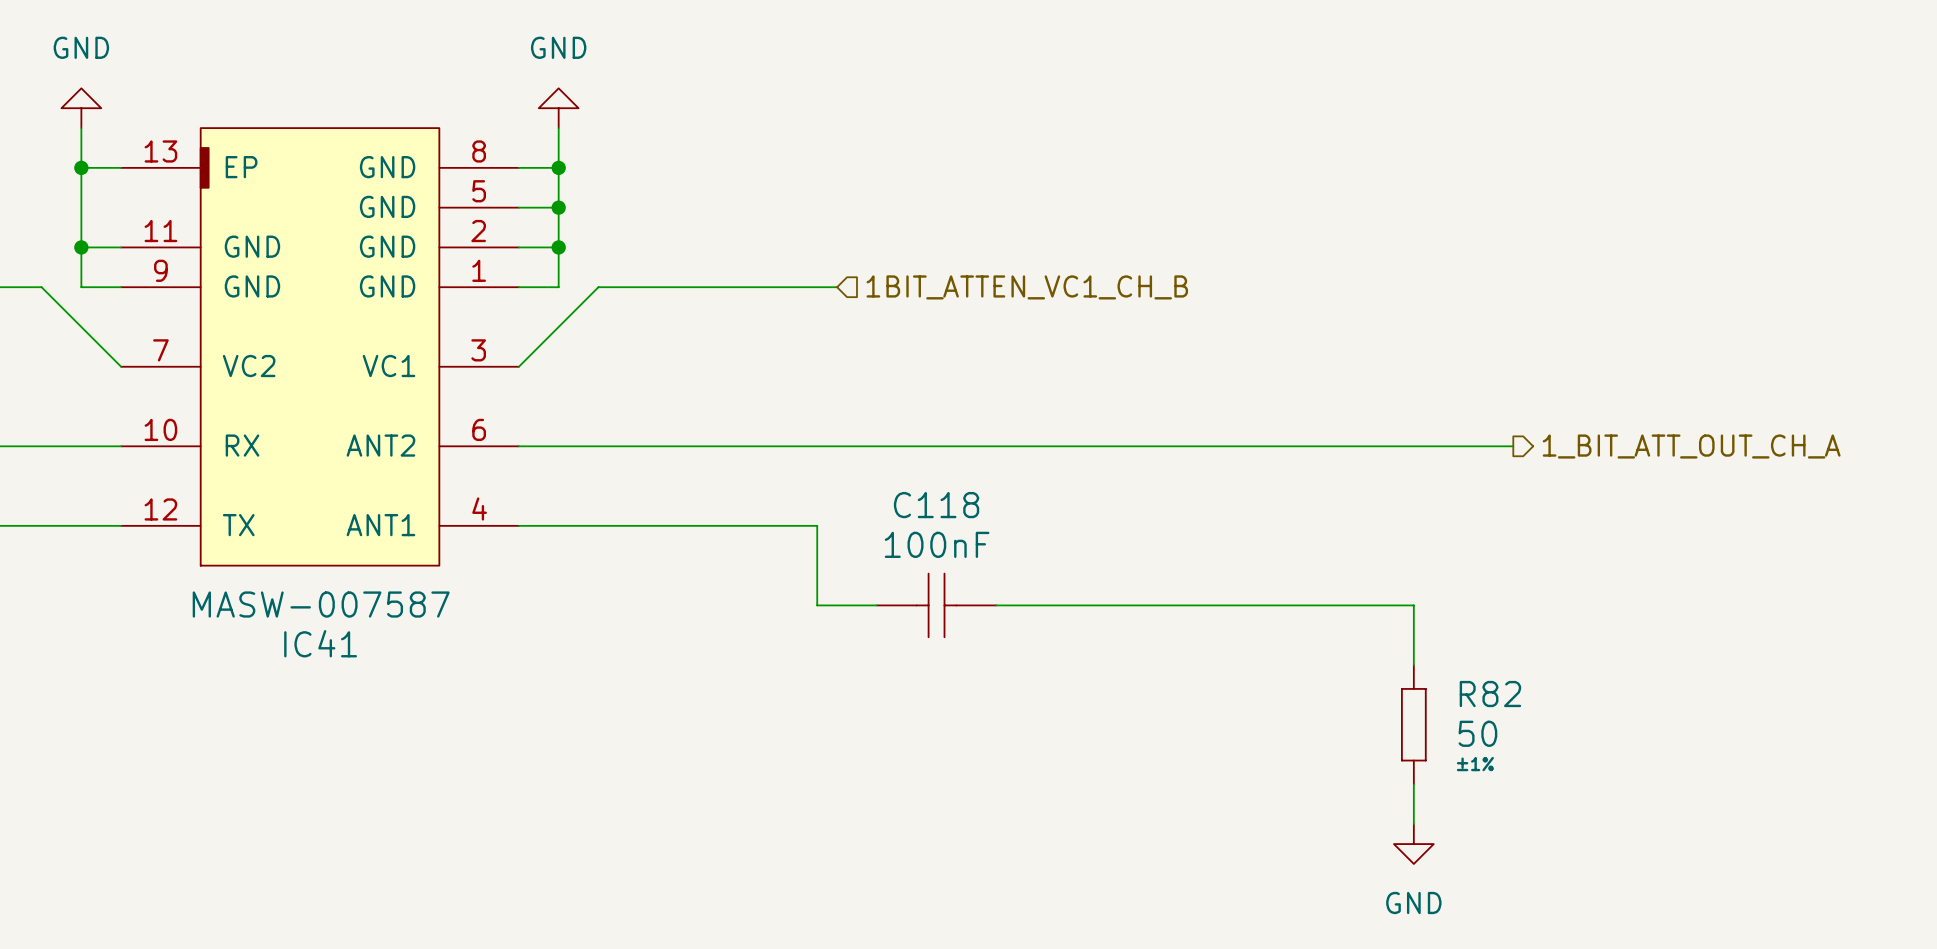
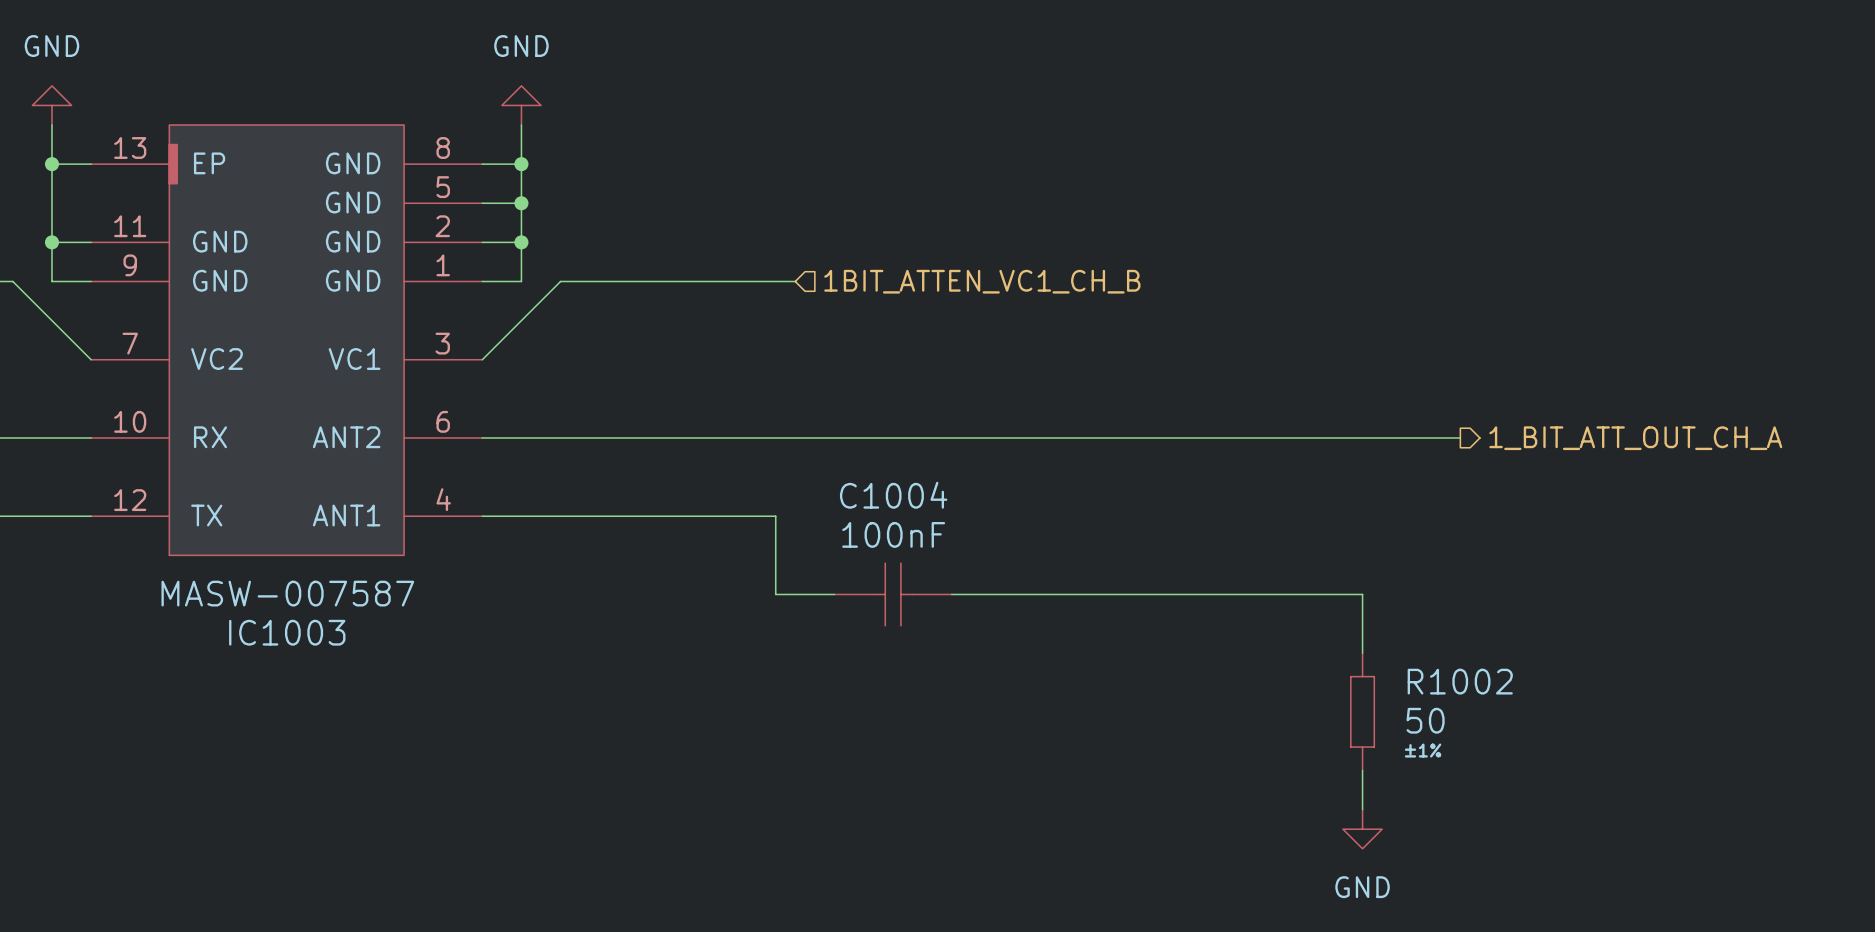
C118 name: C118 (936, 505) -> C1004 (893, 495)
IC41 name: IC41 (320, 643) -> IC1003 (287, 632)
R82 name: R82 (1490, 694) -> R1002 (1460, 681)

